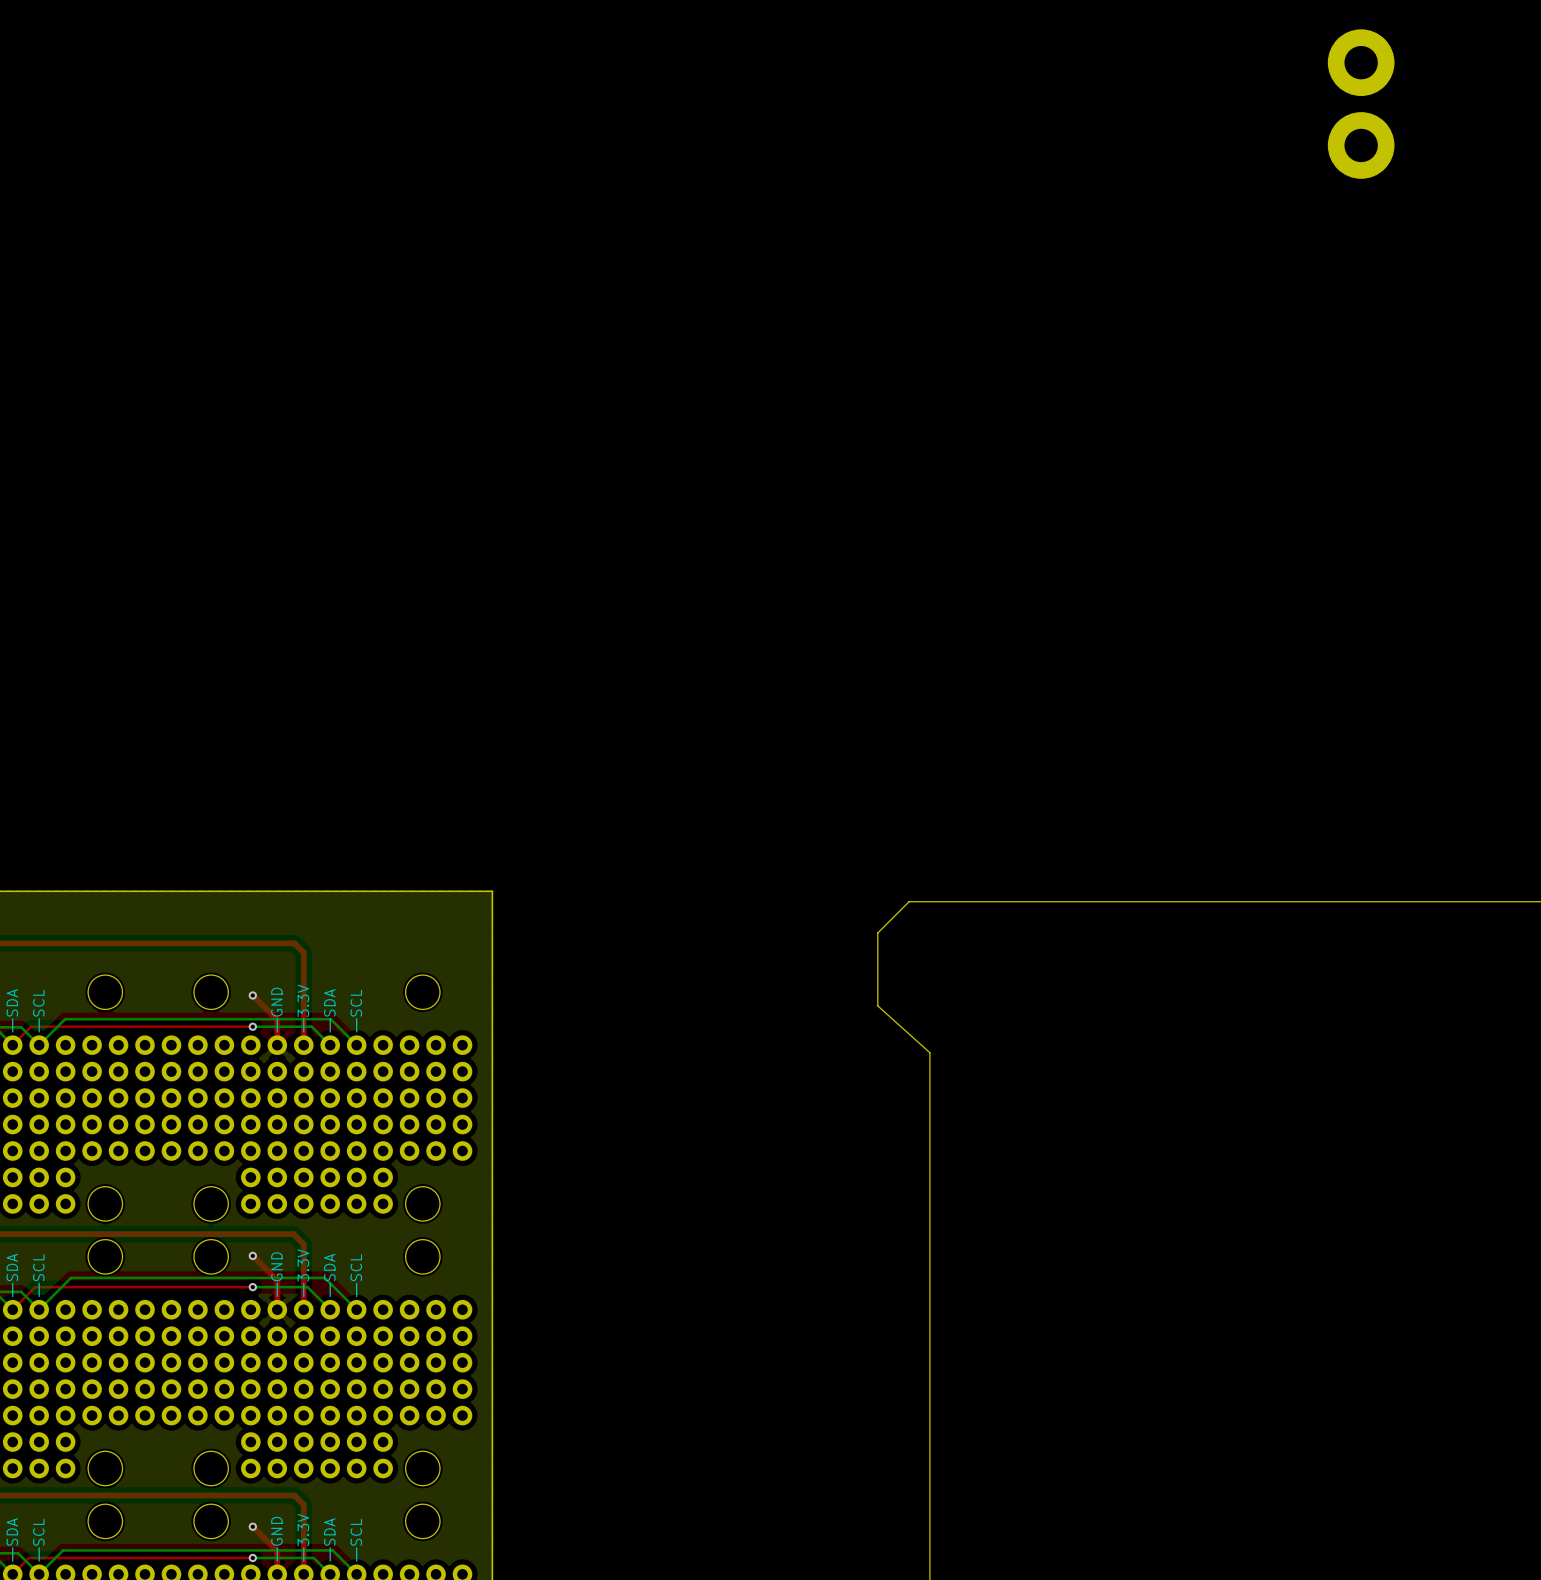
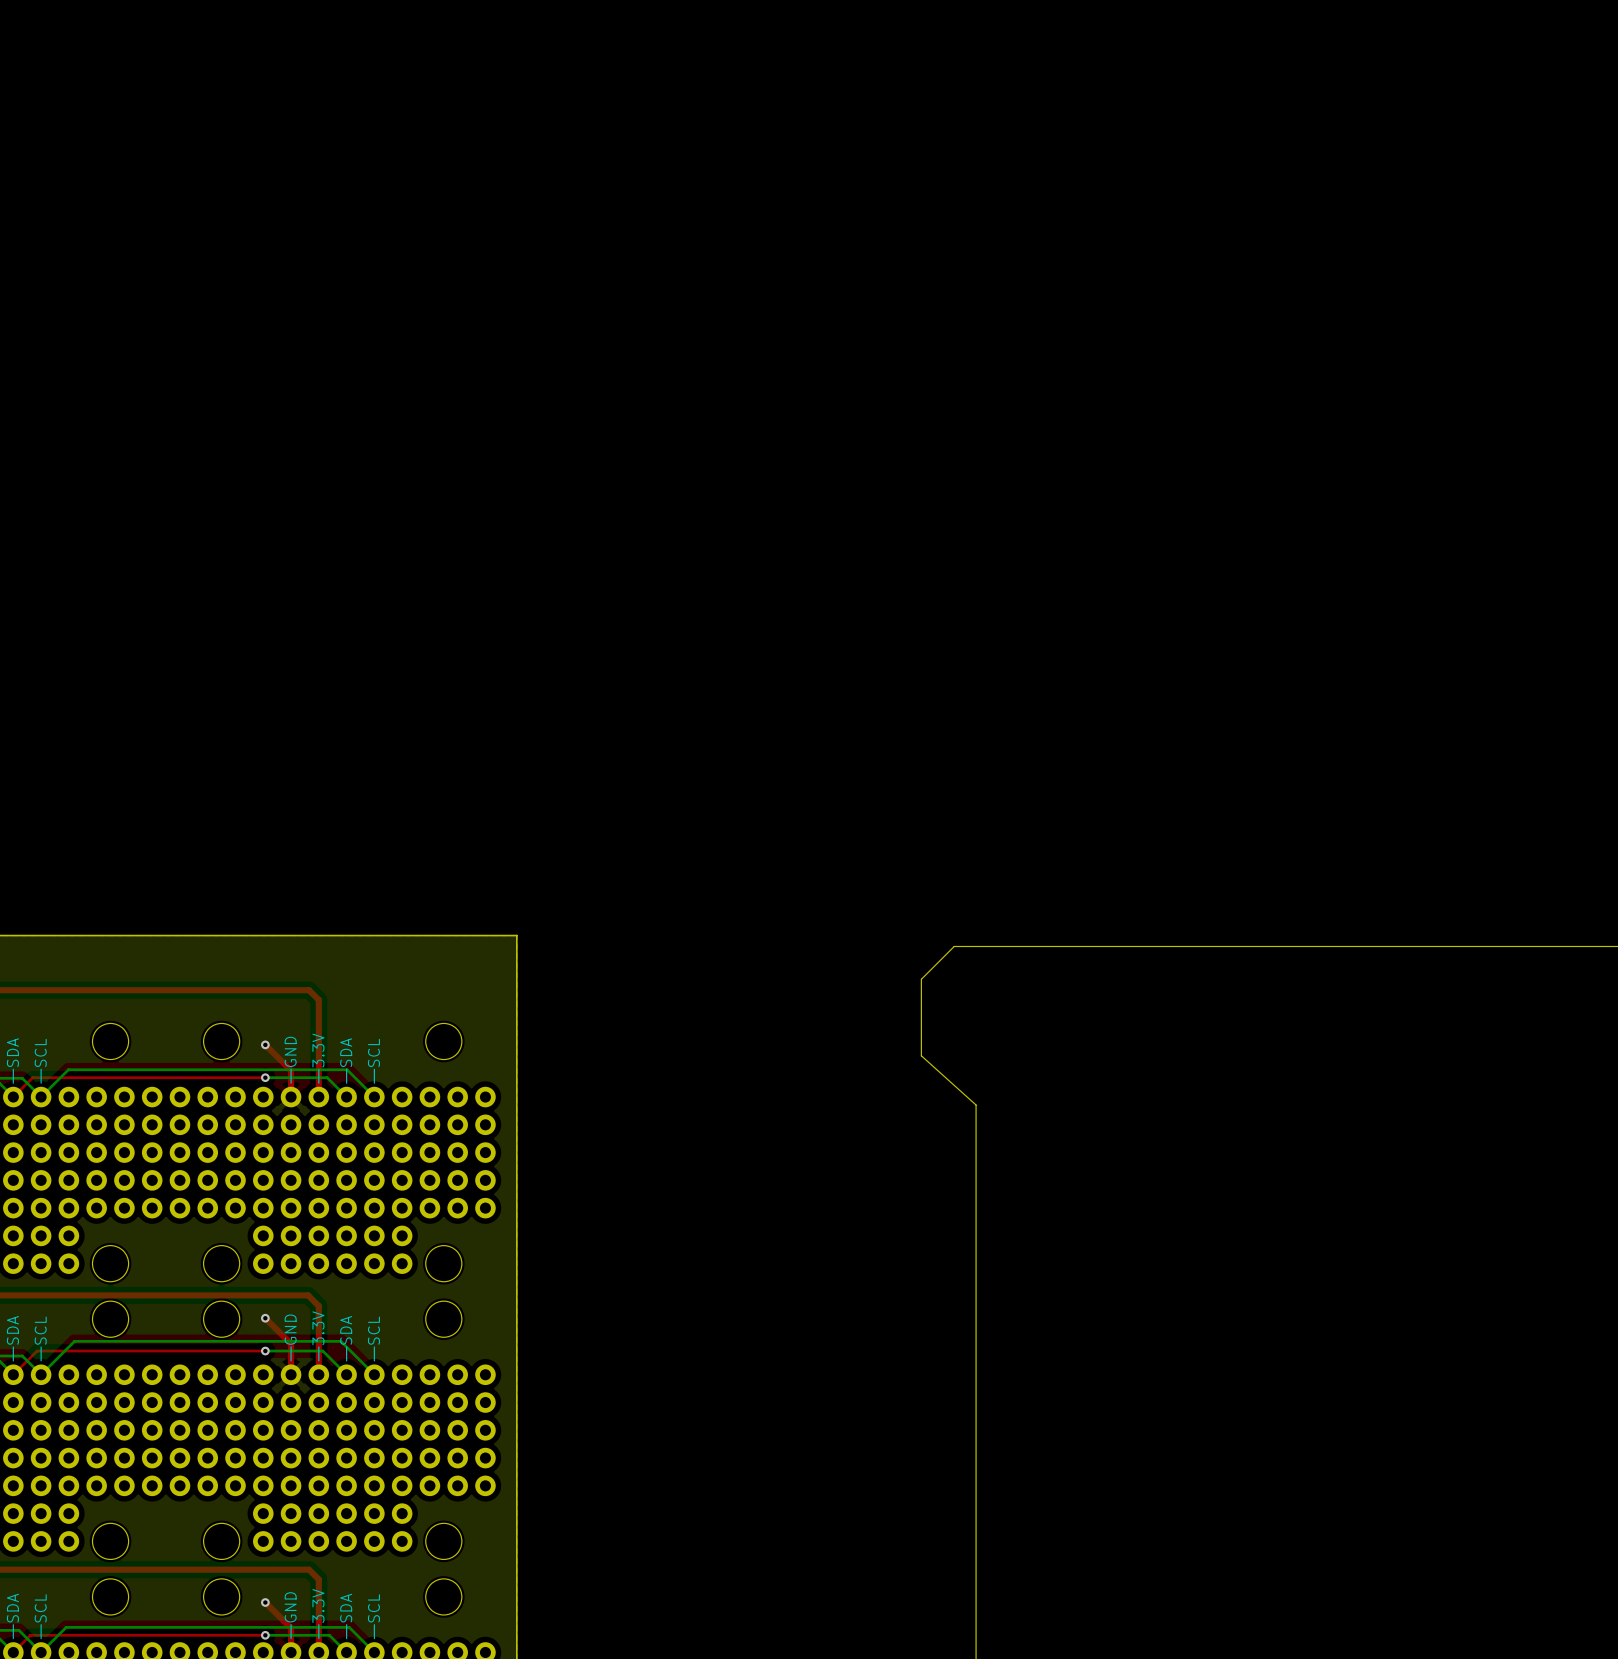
part: (1361, 62) -> none
part: (1361, 145) -> none

